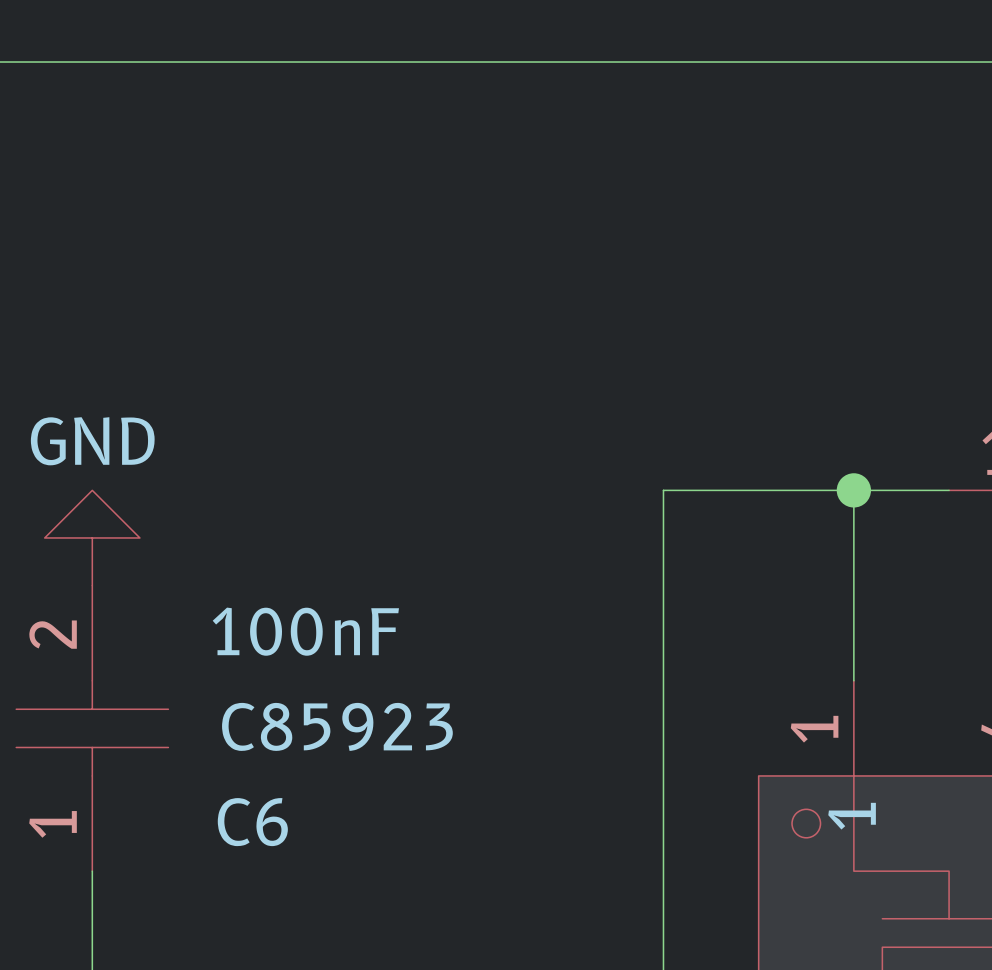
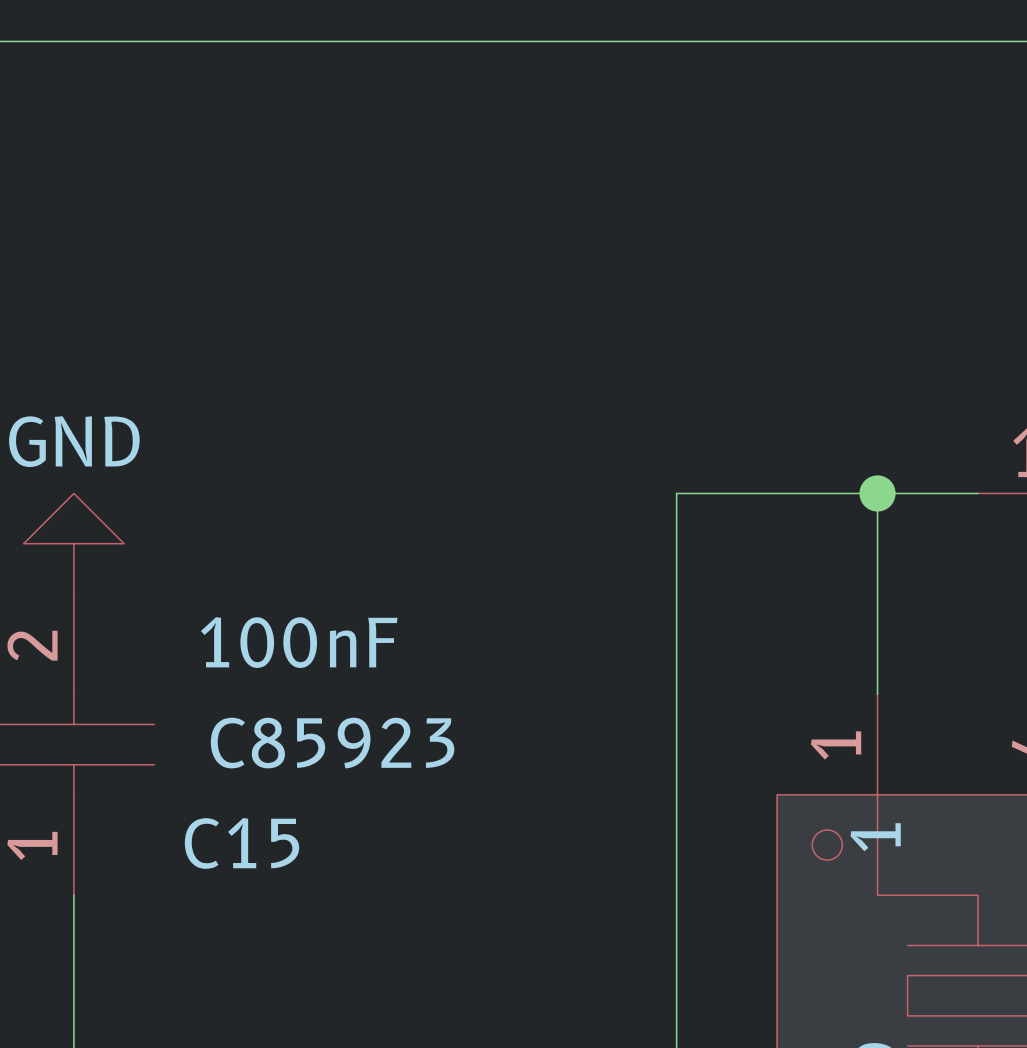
C6 name: C6 (252, 822) -> C15 (242, 843)

